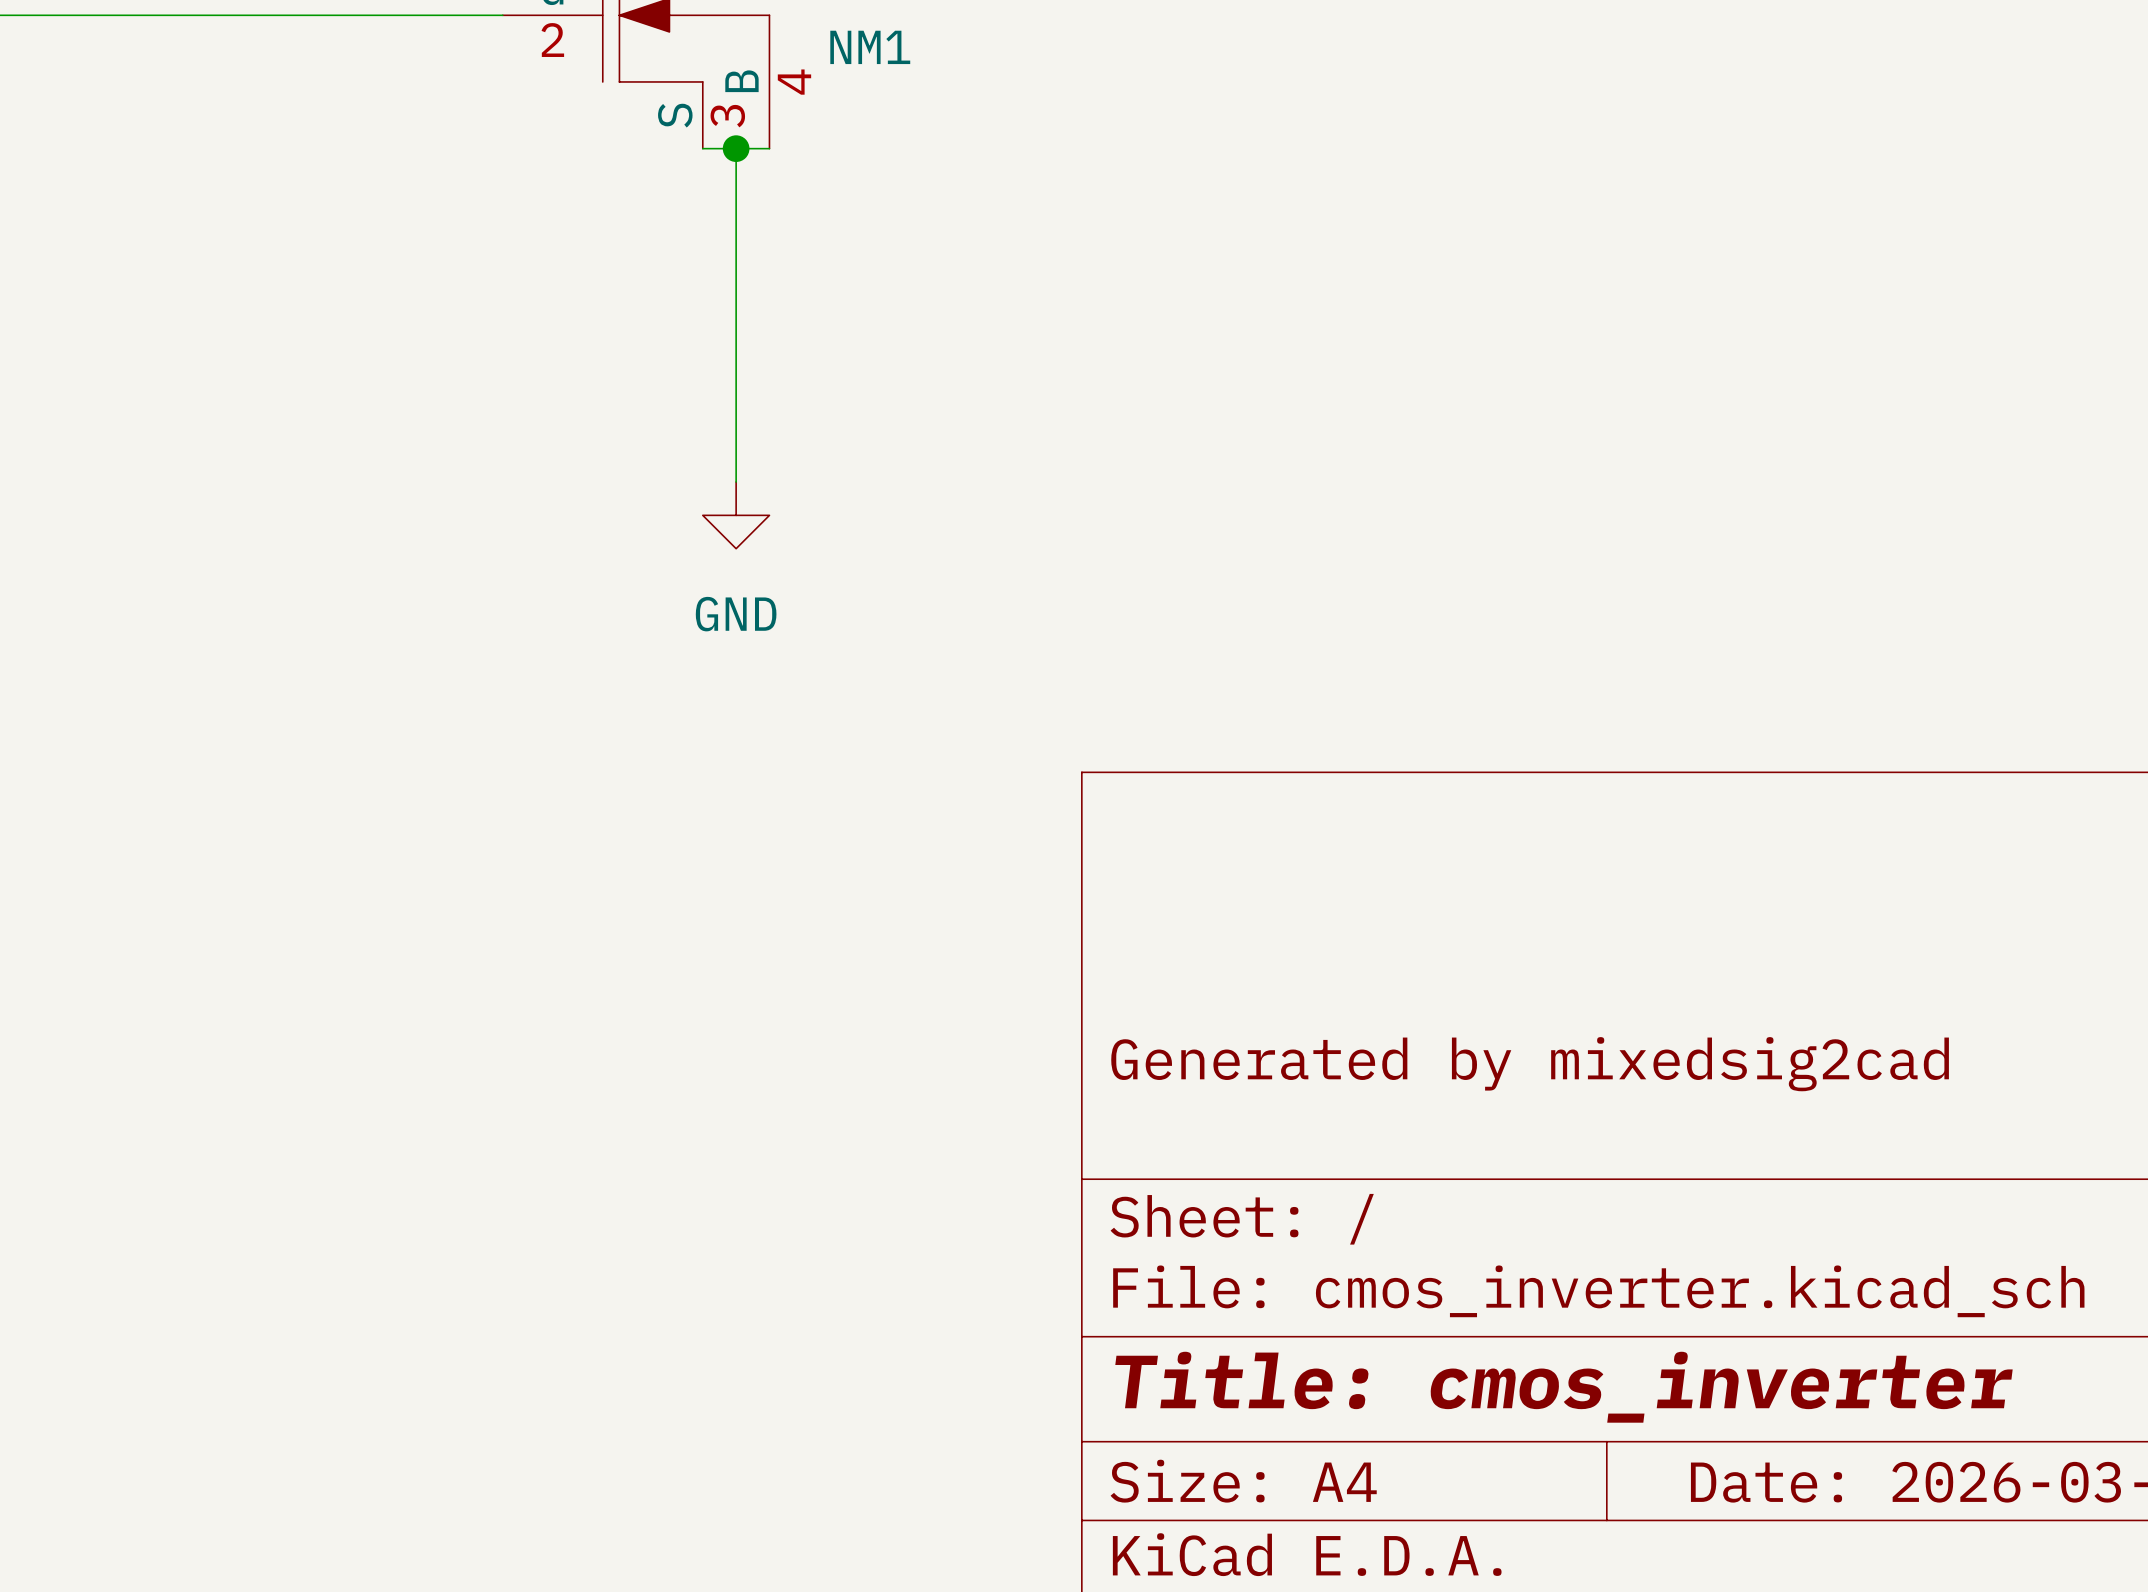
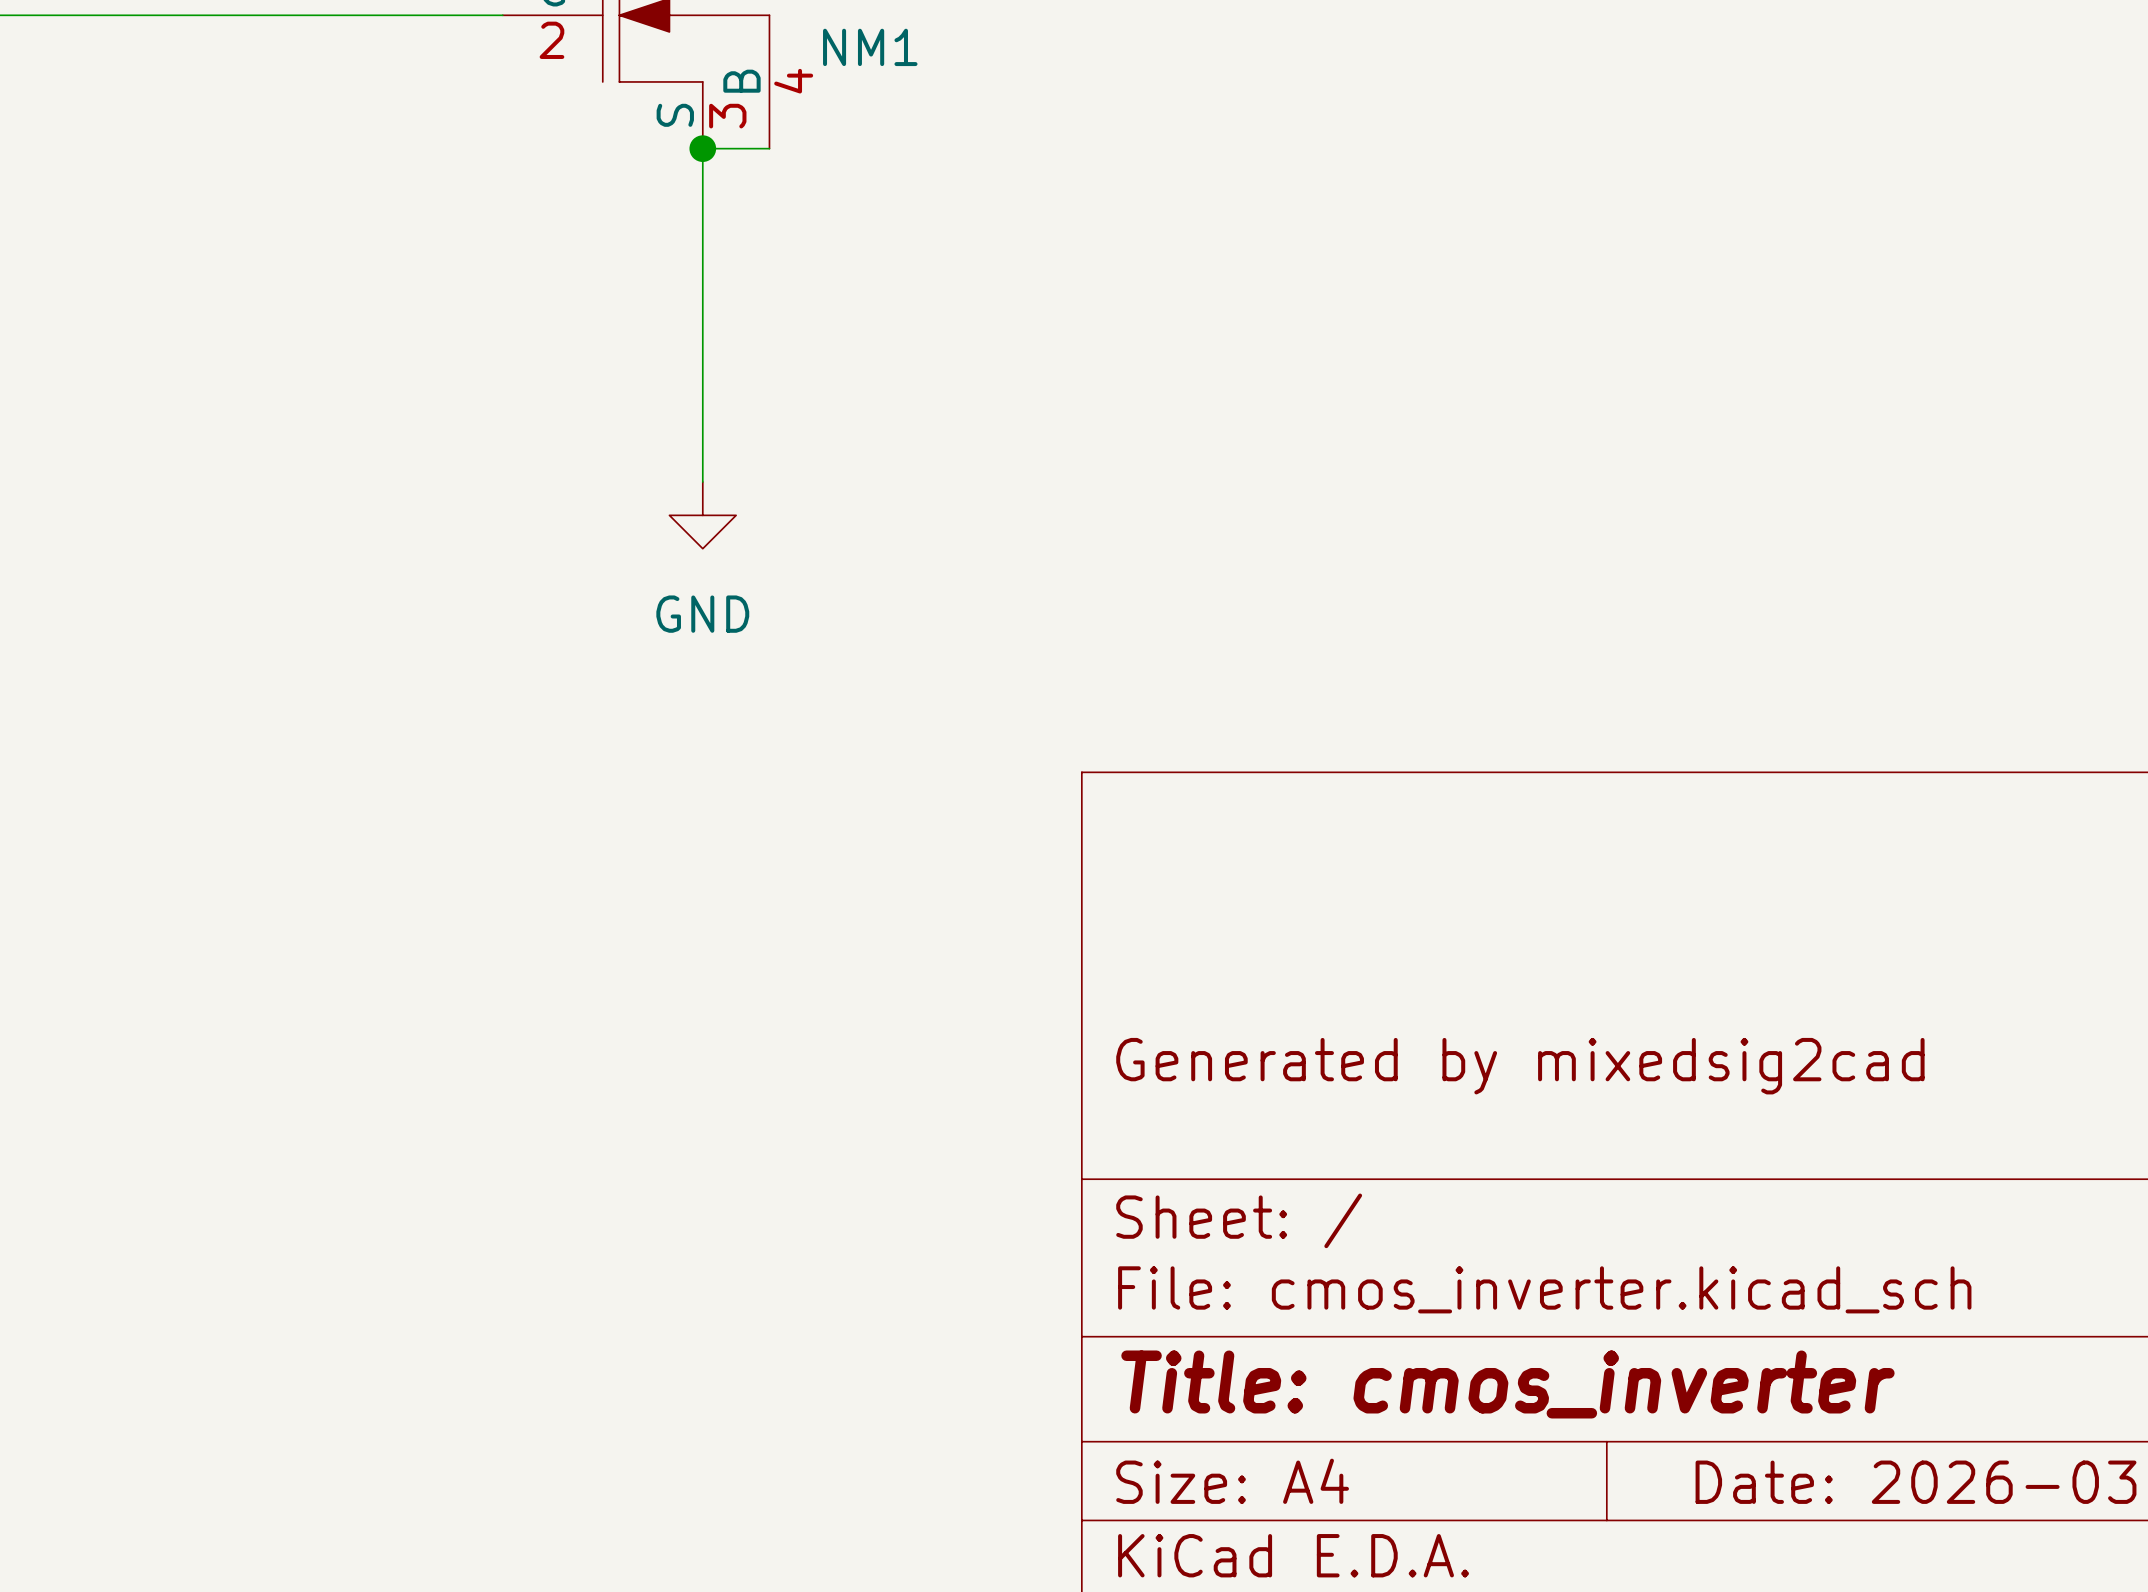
wire: (736, 148) (736, 482) -> (702, 148) (702, 482)
junction position: (736, 148) -> (702, 148)
power symbol position: GND (736, 515) -> GND (702, 515)

